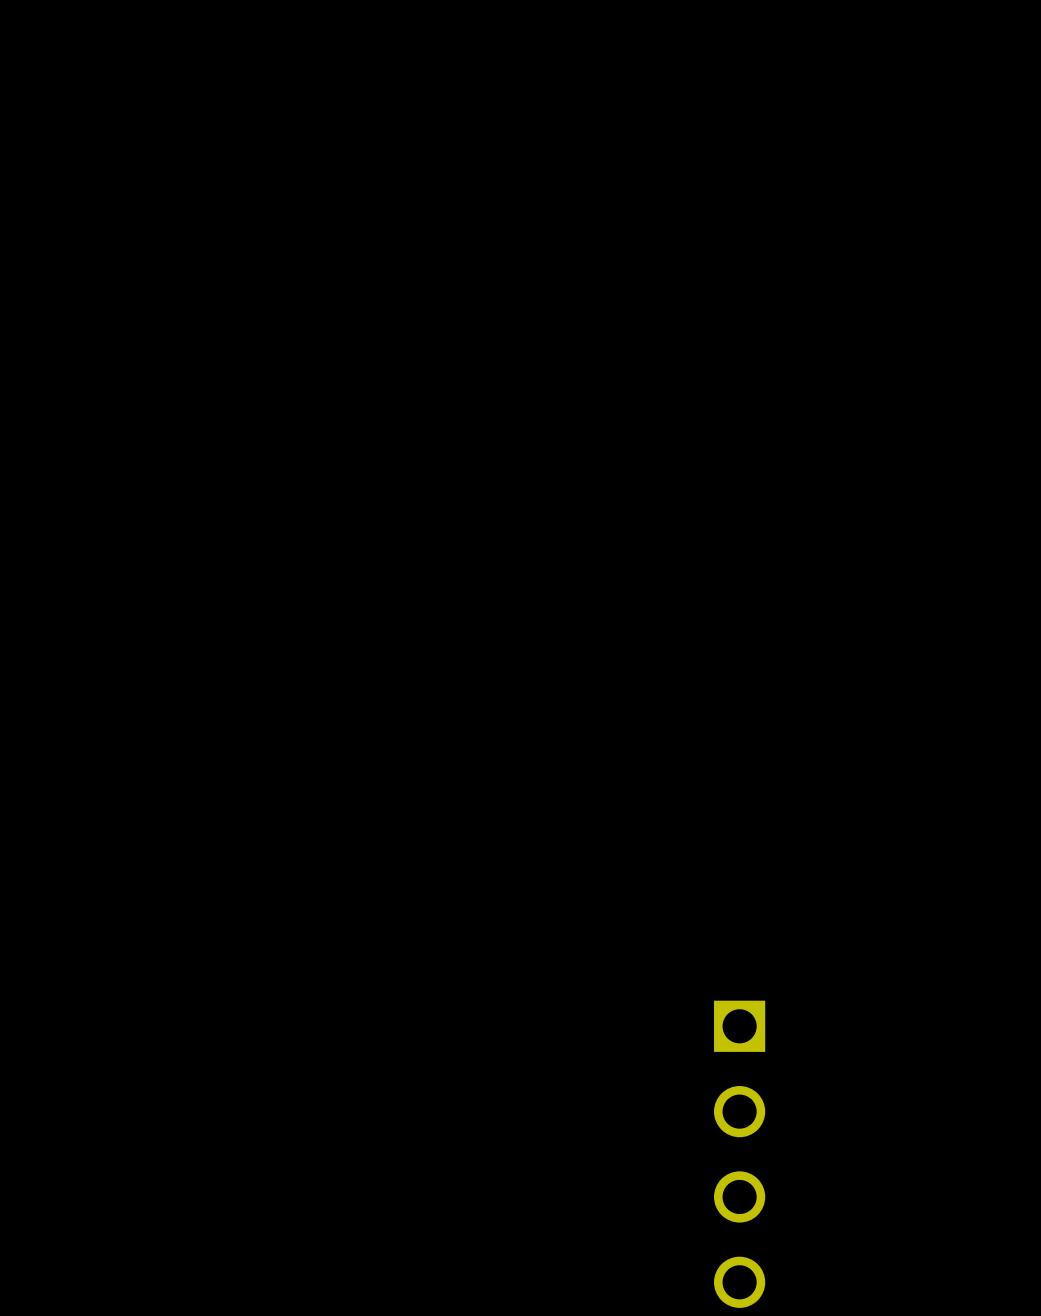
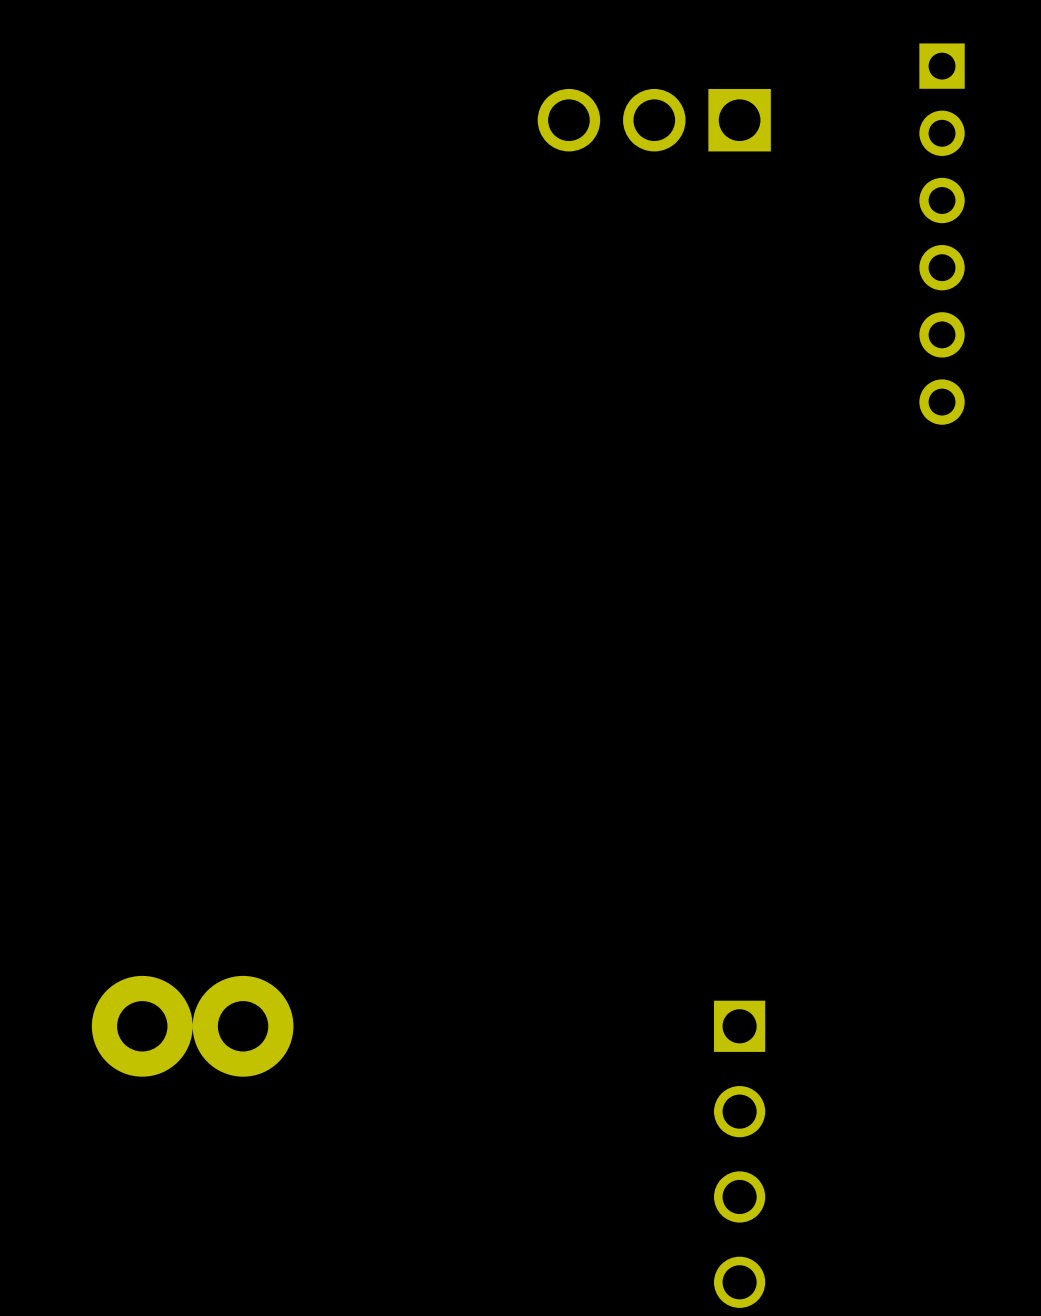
part: none -> (654, 120)
part: none -> (942, 234)
part: none -> (192, 1026)

